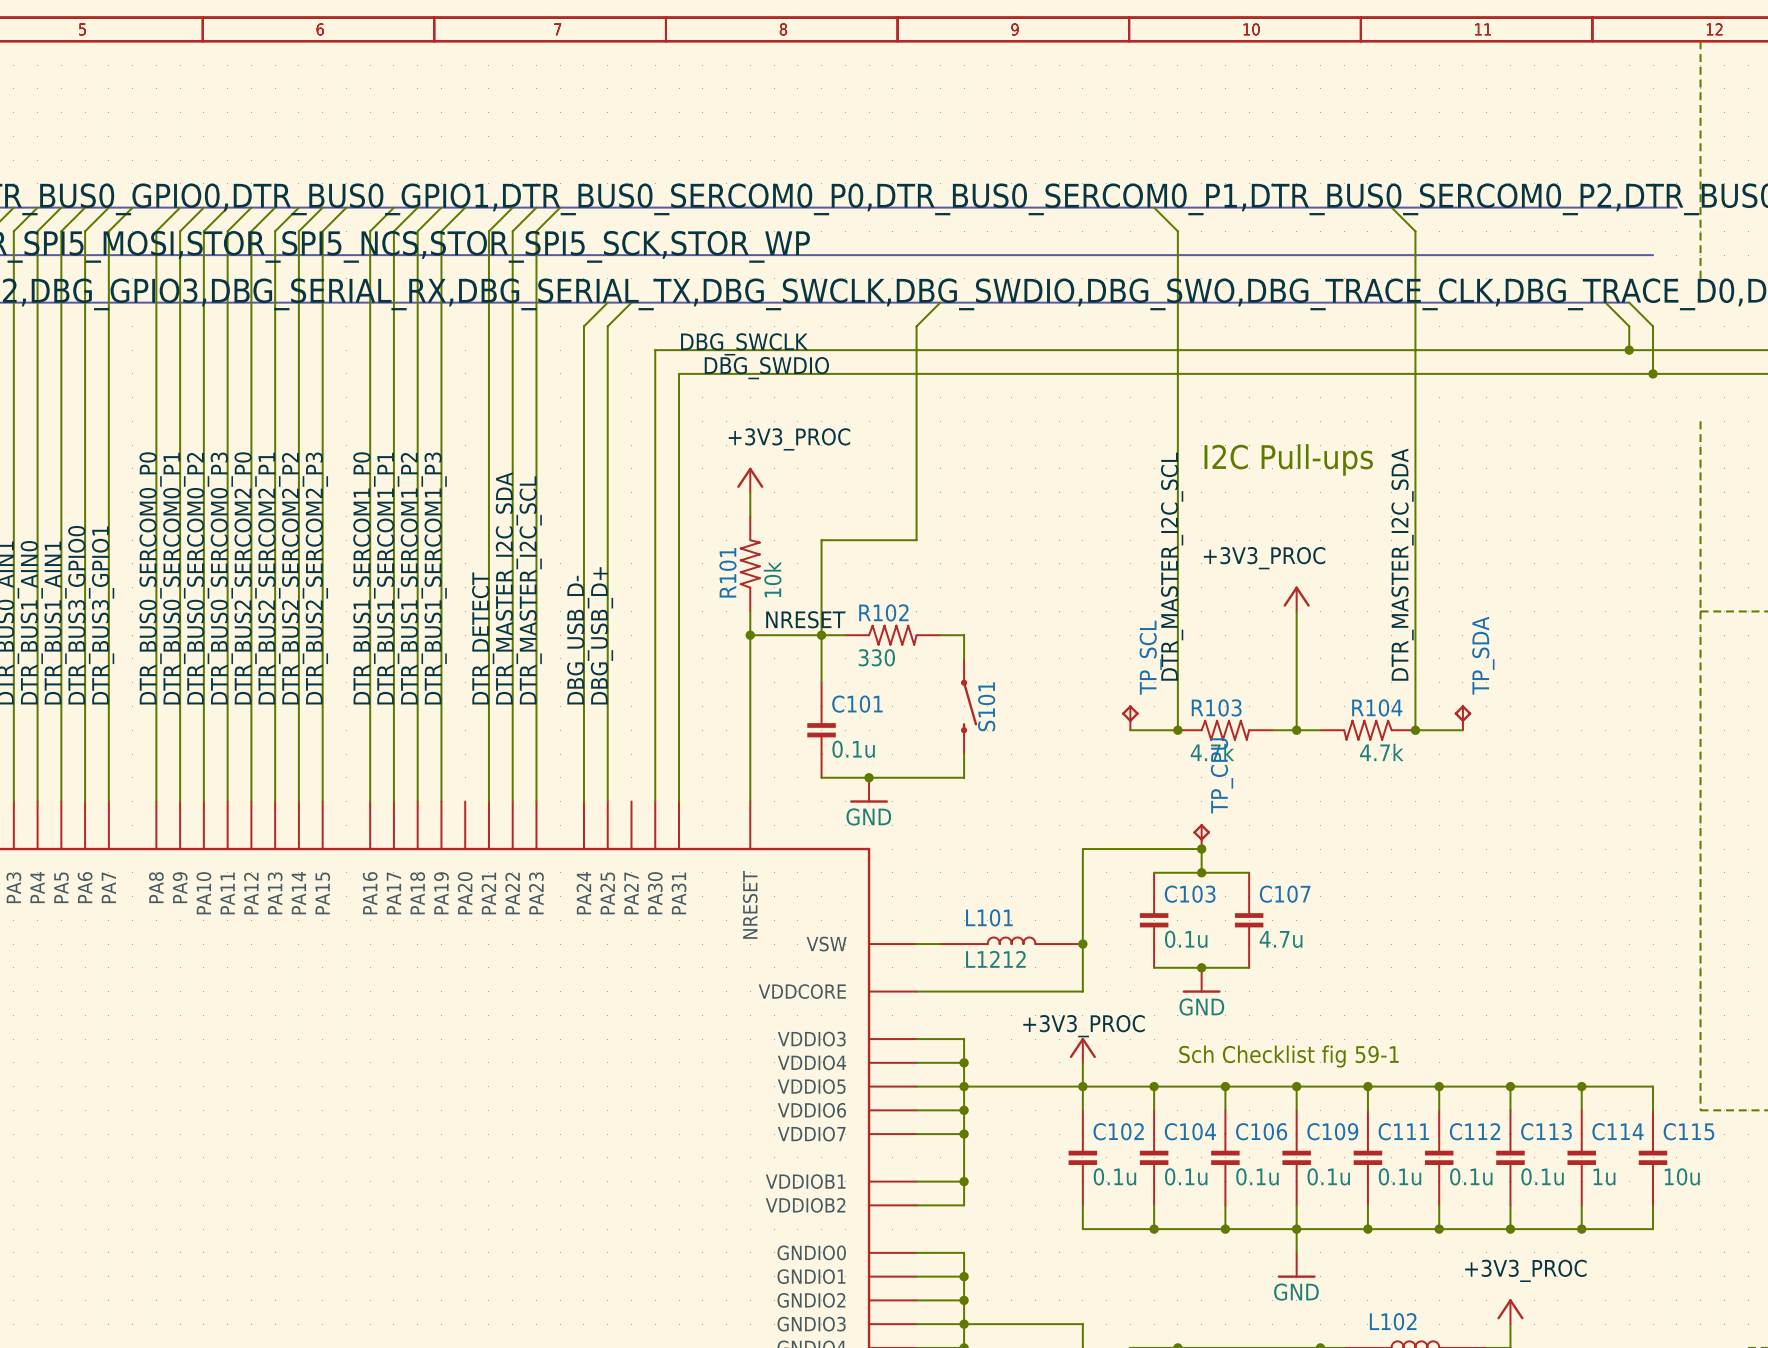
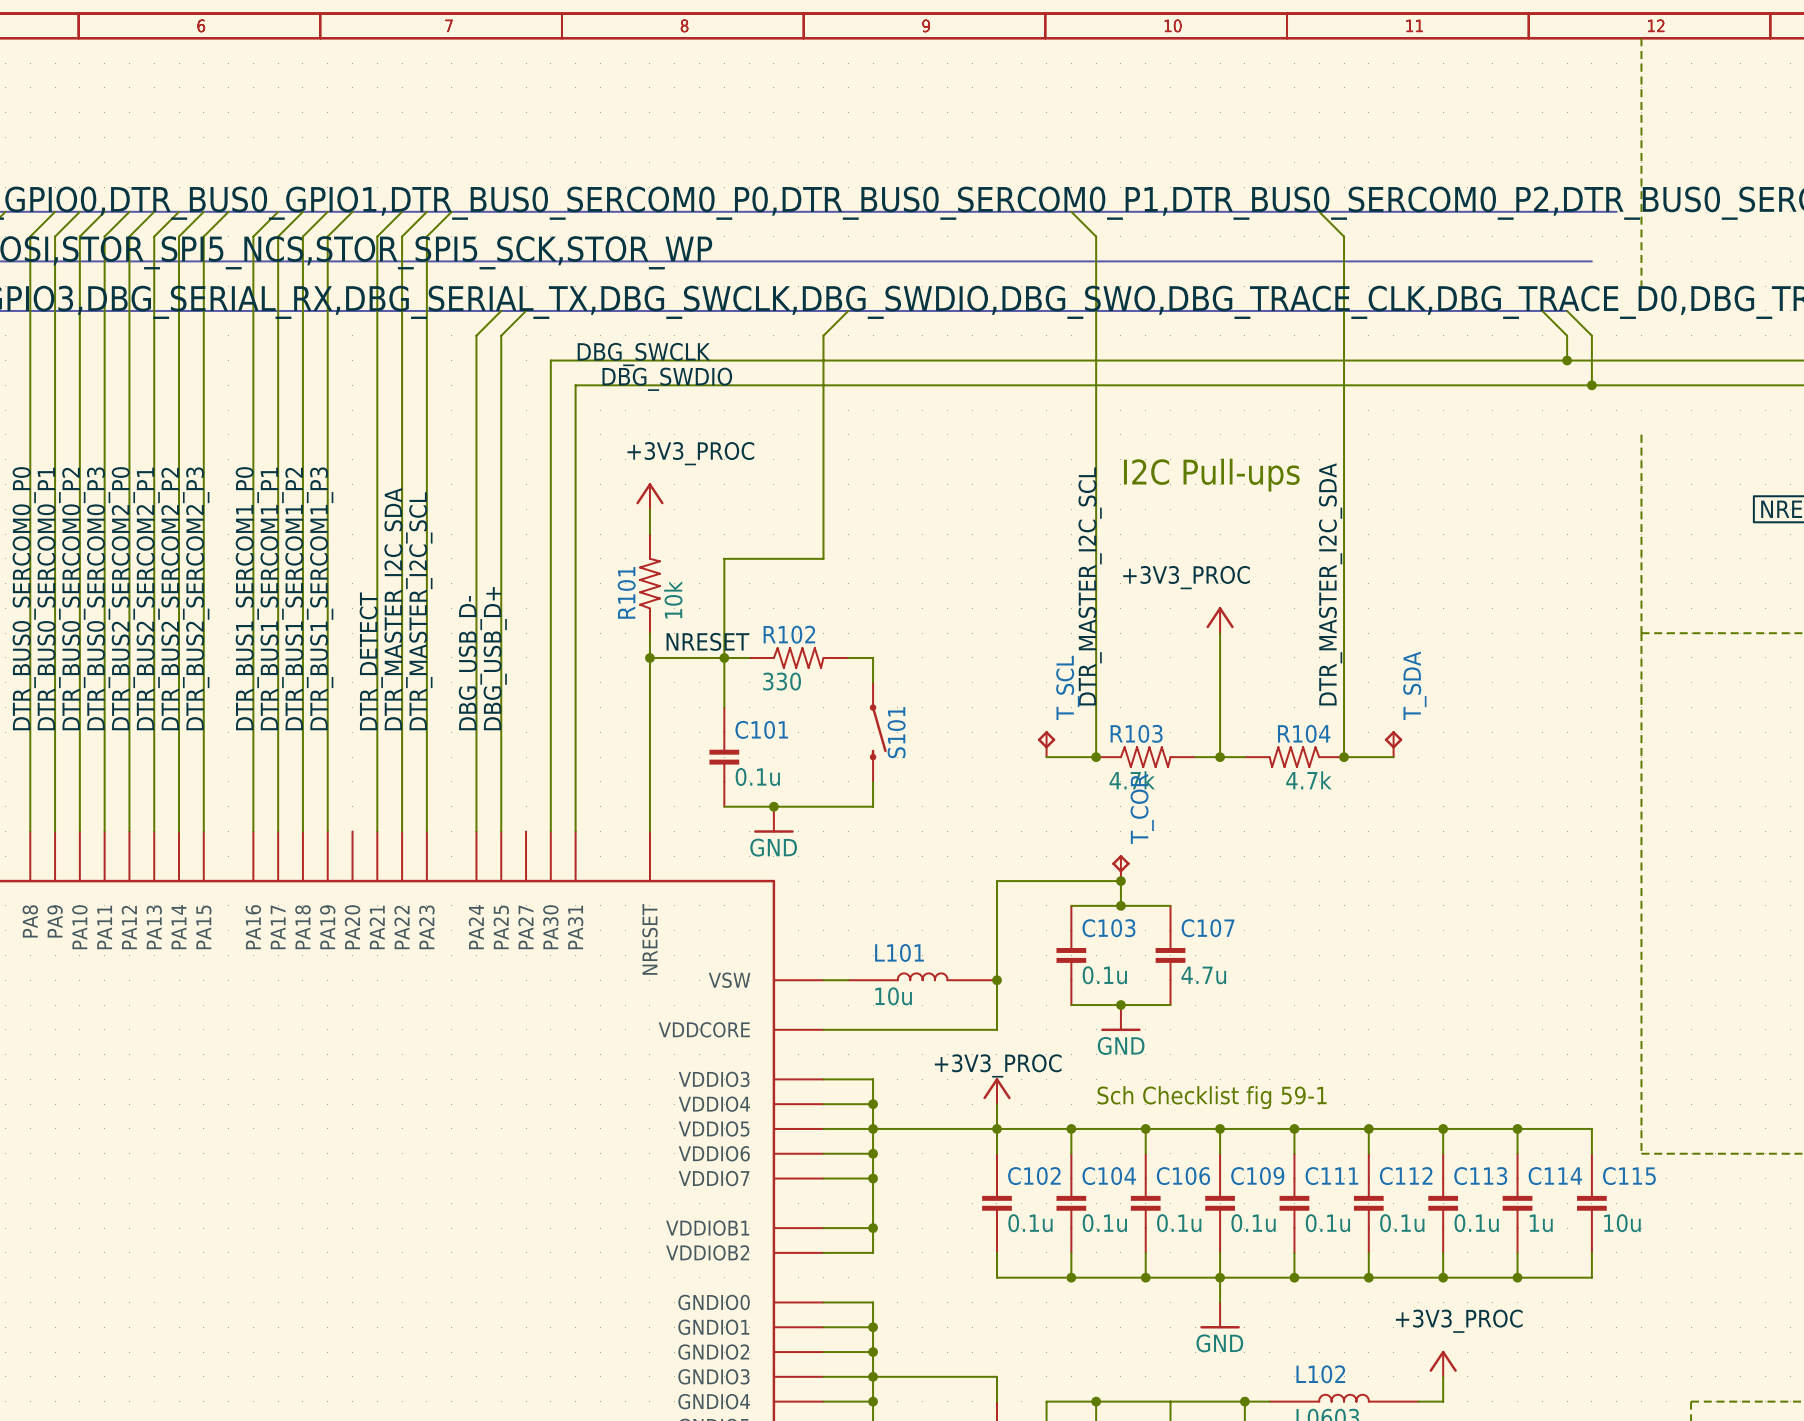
TP_SDA name: TP_SDA (1483, 655) -> T_SDA (1414, 685)
TP_SCL name: TP_SCL (1150, 657) -> T_SCL (1067, 687)
TP_CPU name: TP_CPU (1222, 775) -> T_COR (1142, 808)
L101 value: L1212 (995, 959) -> 10u (893, 996)

